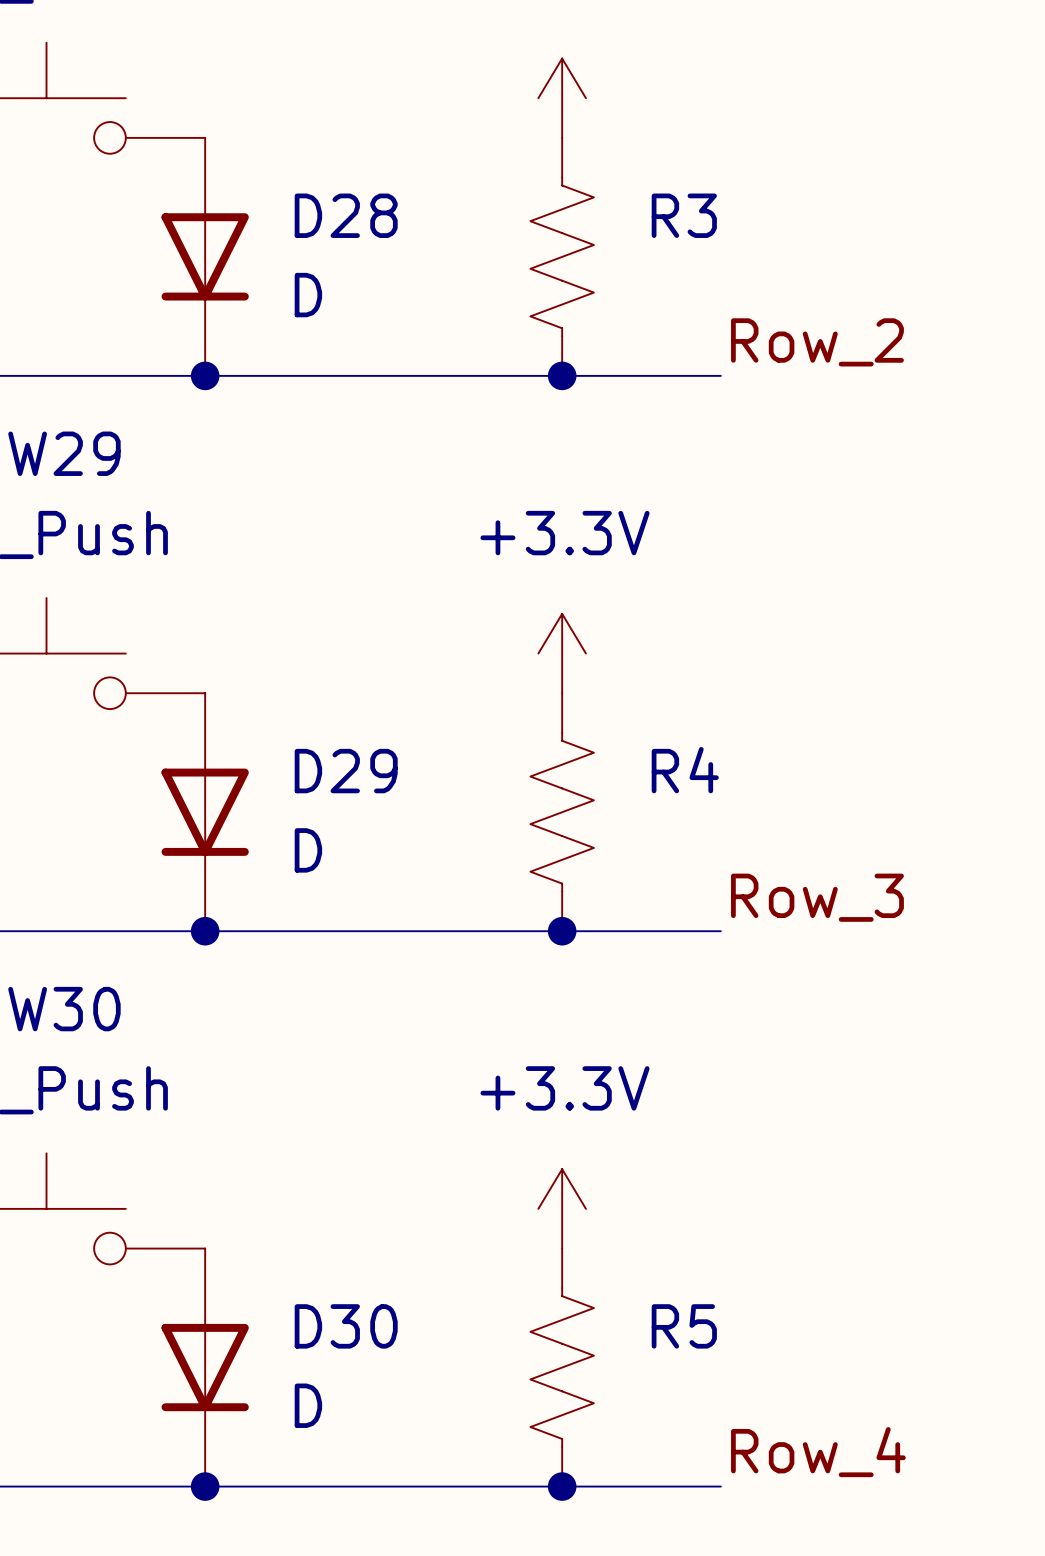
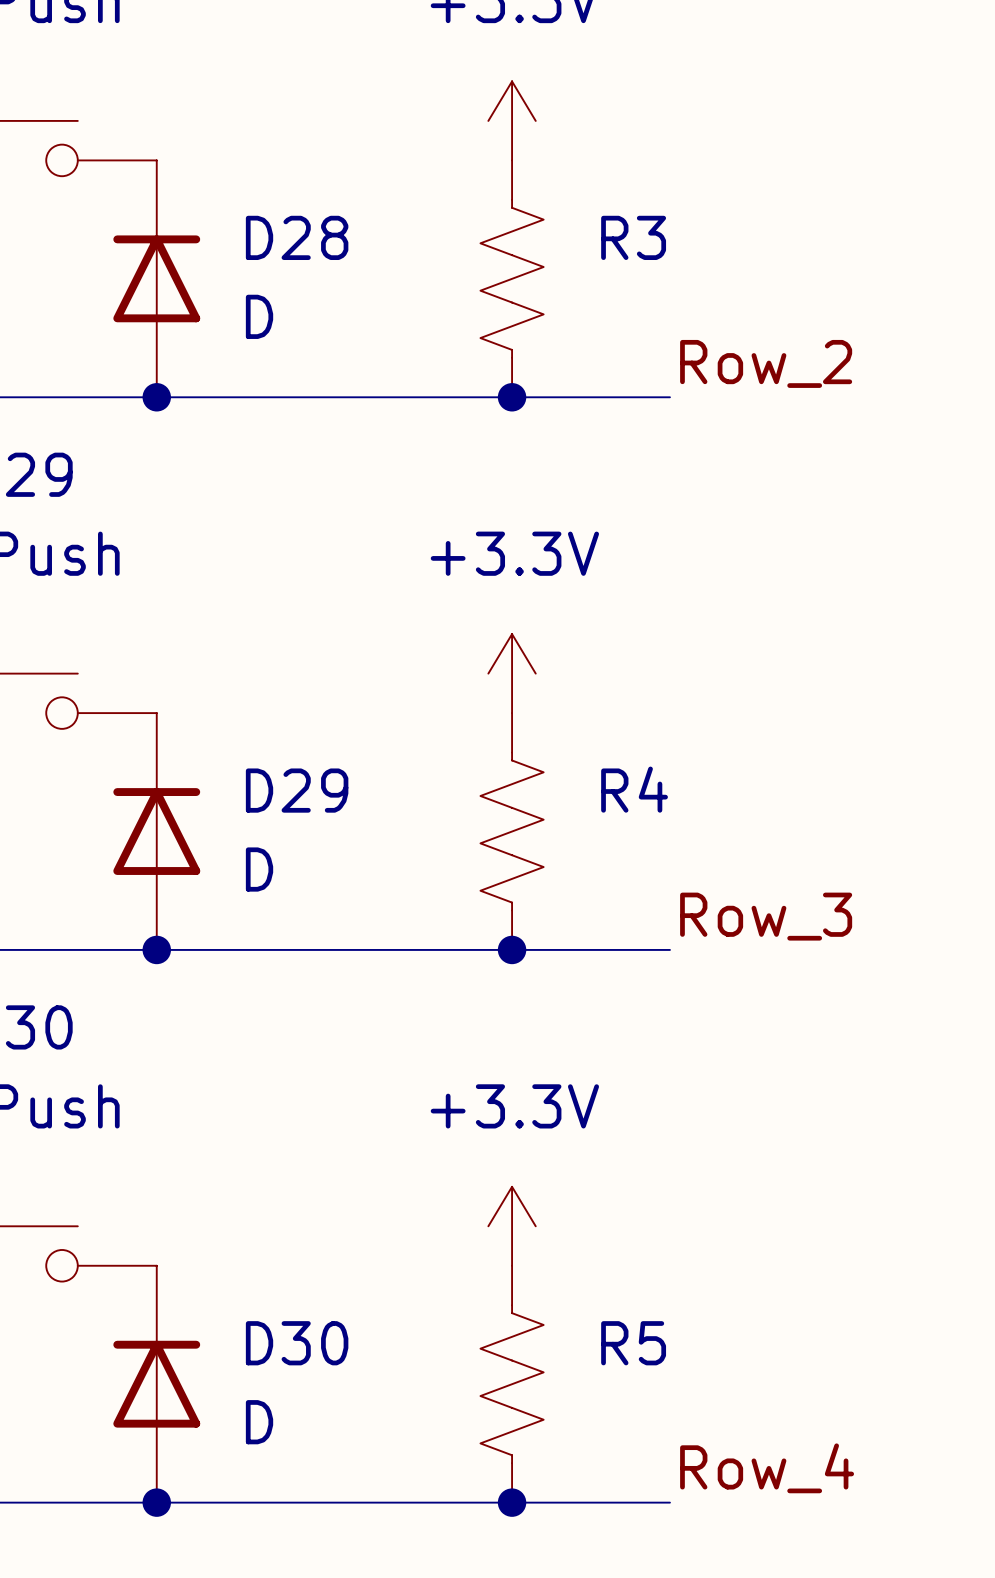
D28 rotation: 0° (205, 256) -> 180° (156, 278)
D29 rotation: 0° (205, 812) -> 180° (156, 831)
D30 rotation: 0° (205, 1367) -> 180° (156, 1384)

